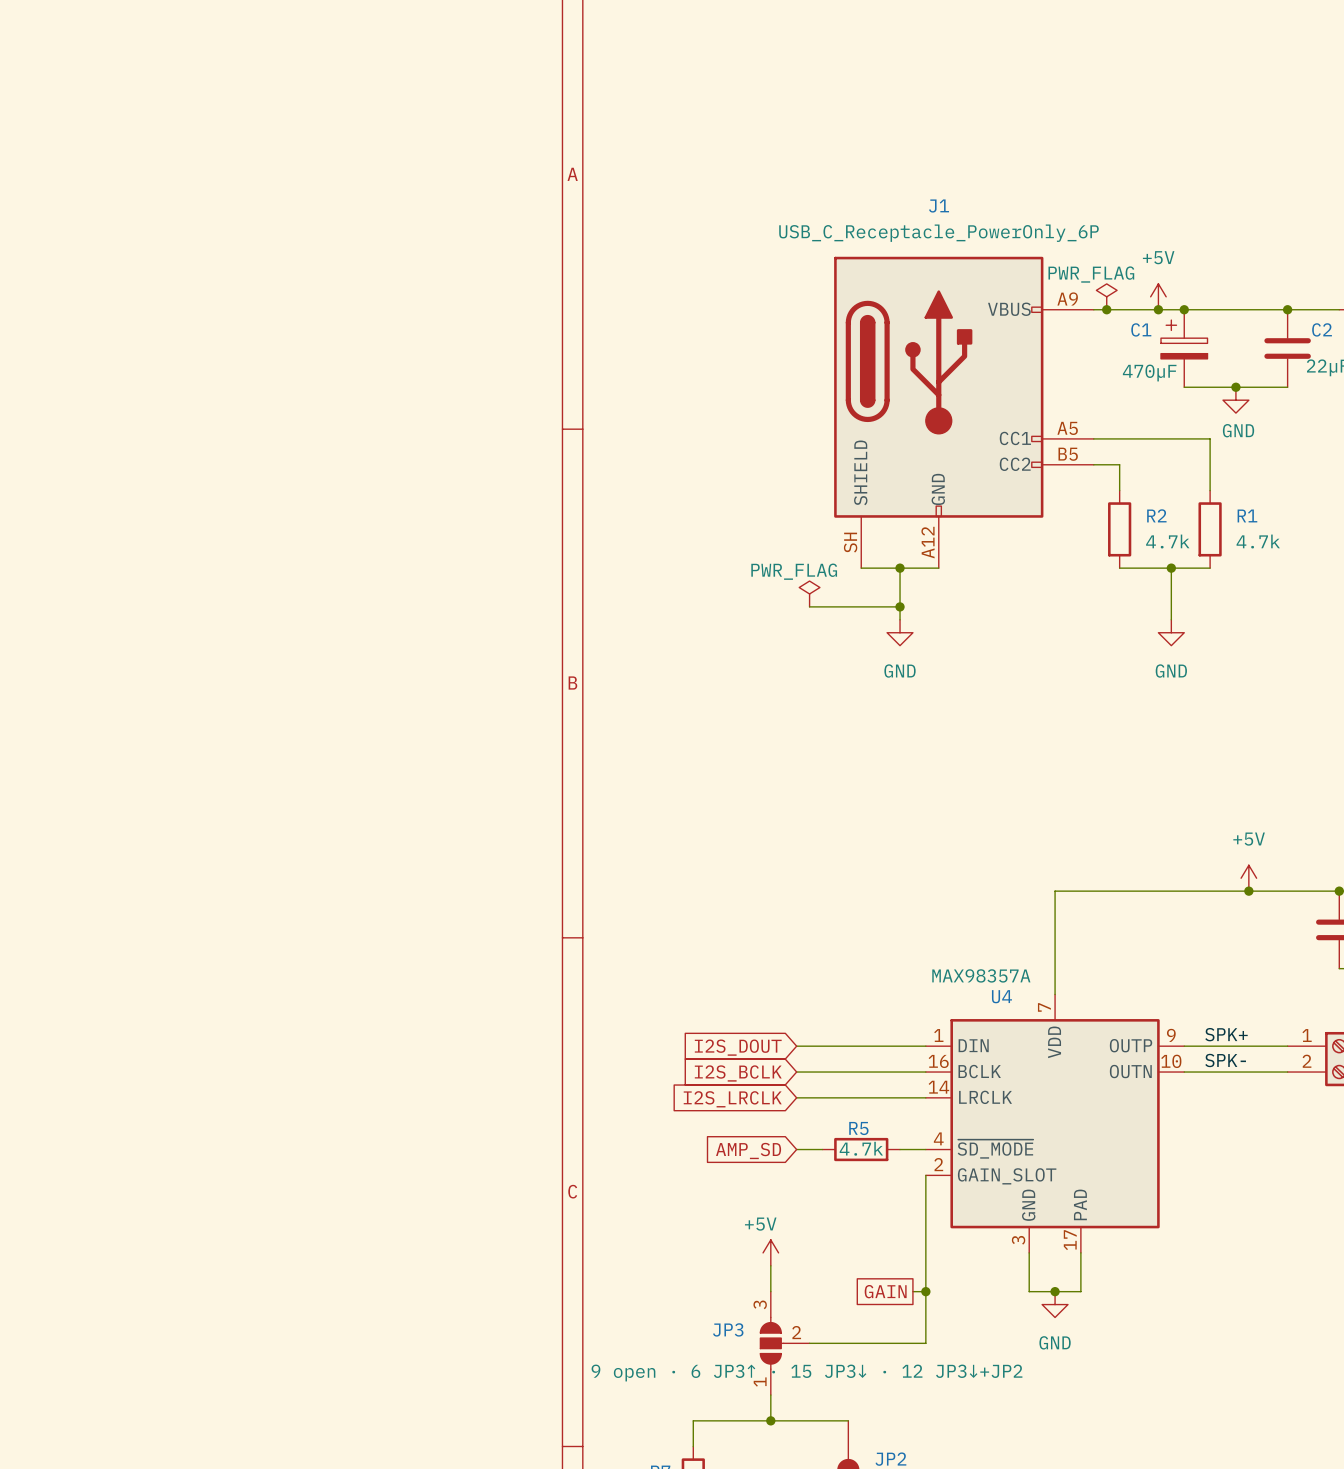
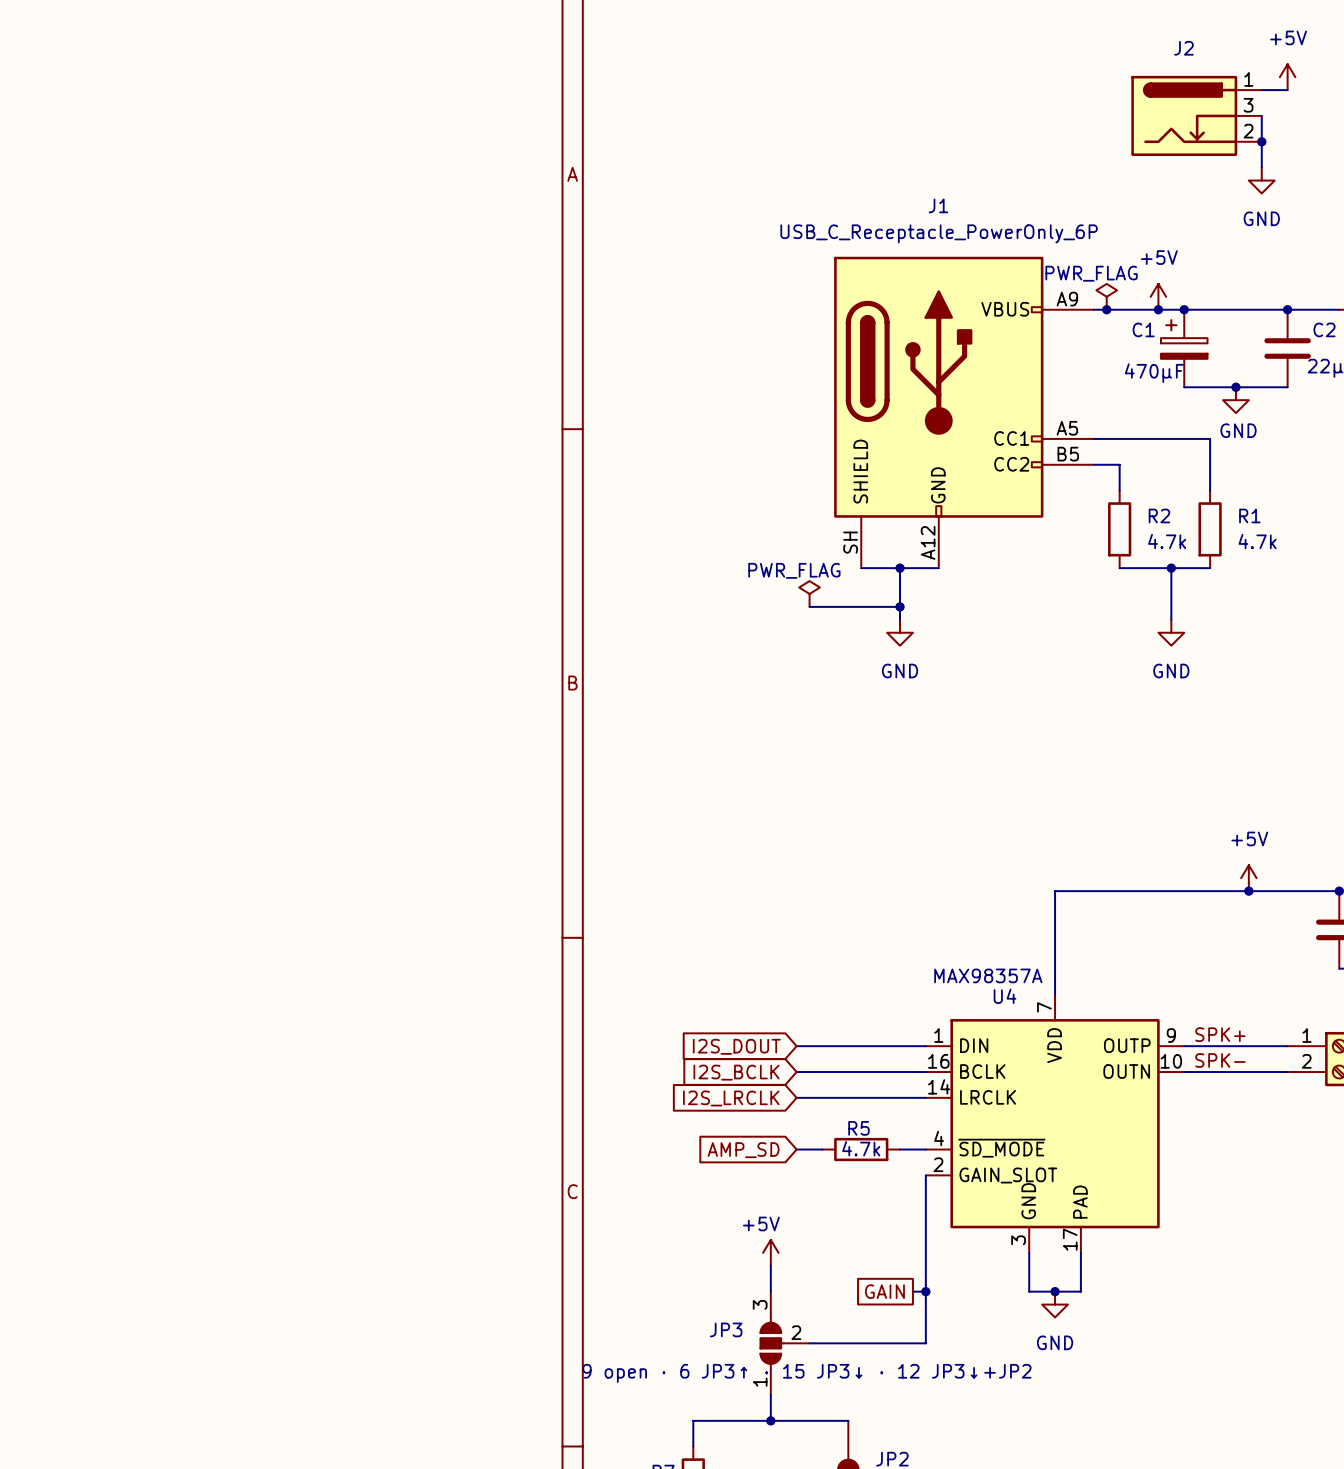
power symbol: none -> +5V (1287, 77)
wire: none -> (1261, 90) (1287, 90)
J2: none -> (1196, 115)
wire: none -> (1261, 115) (1261, 167)
junction: none -> (1261, 141)
power symbol: none -> GND (1261, 180)

